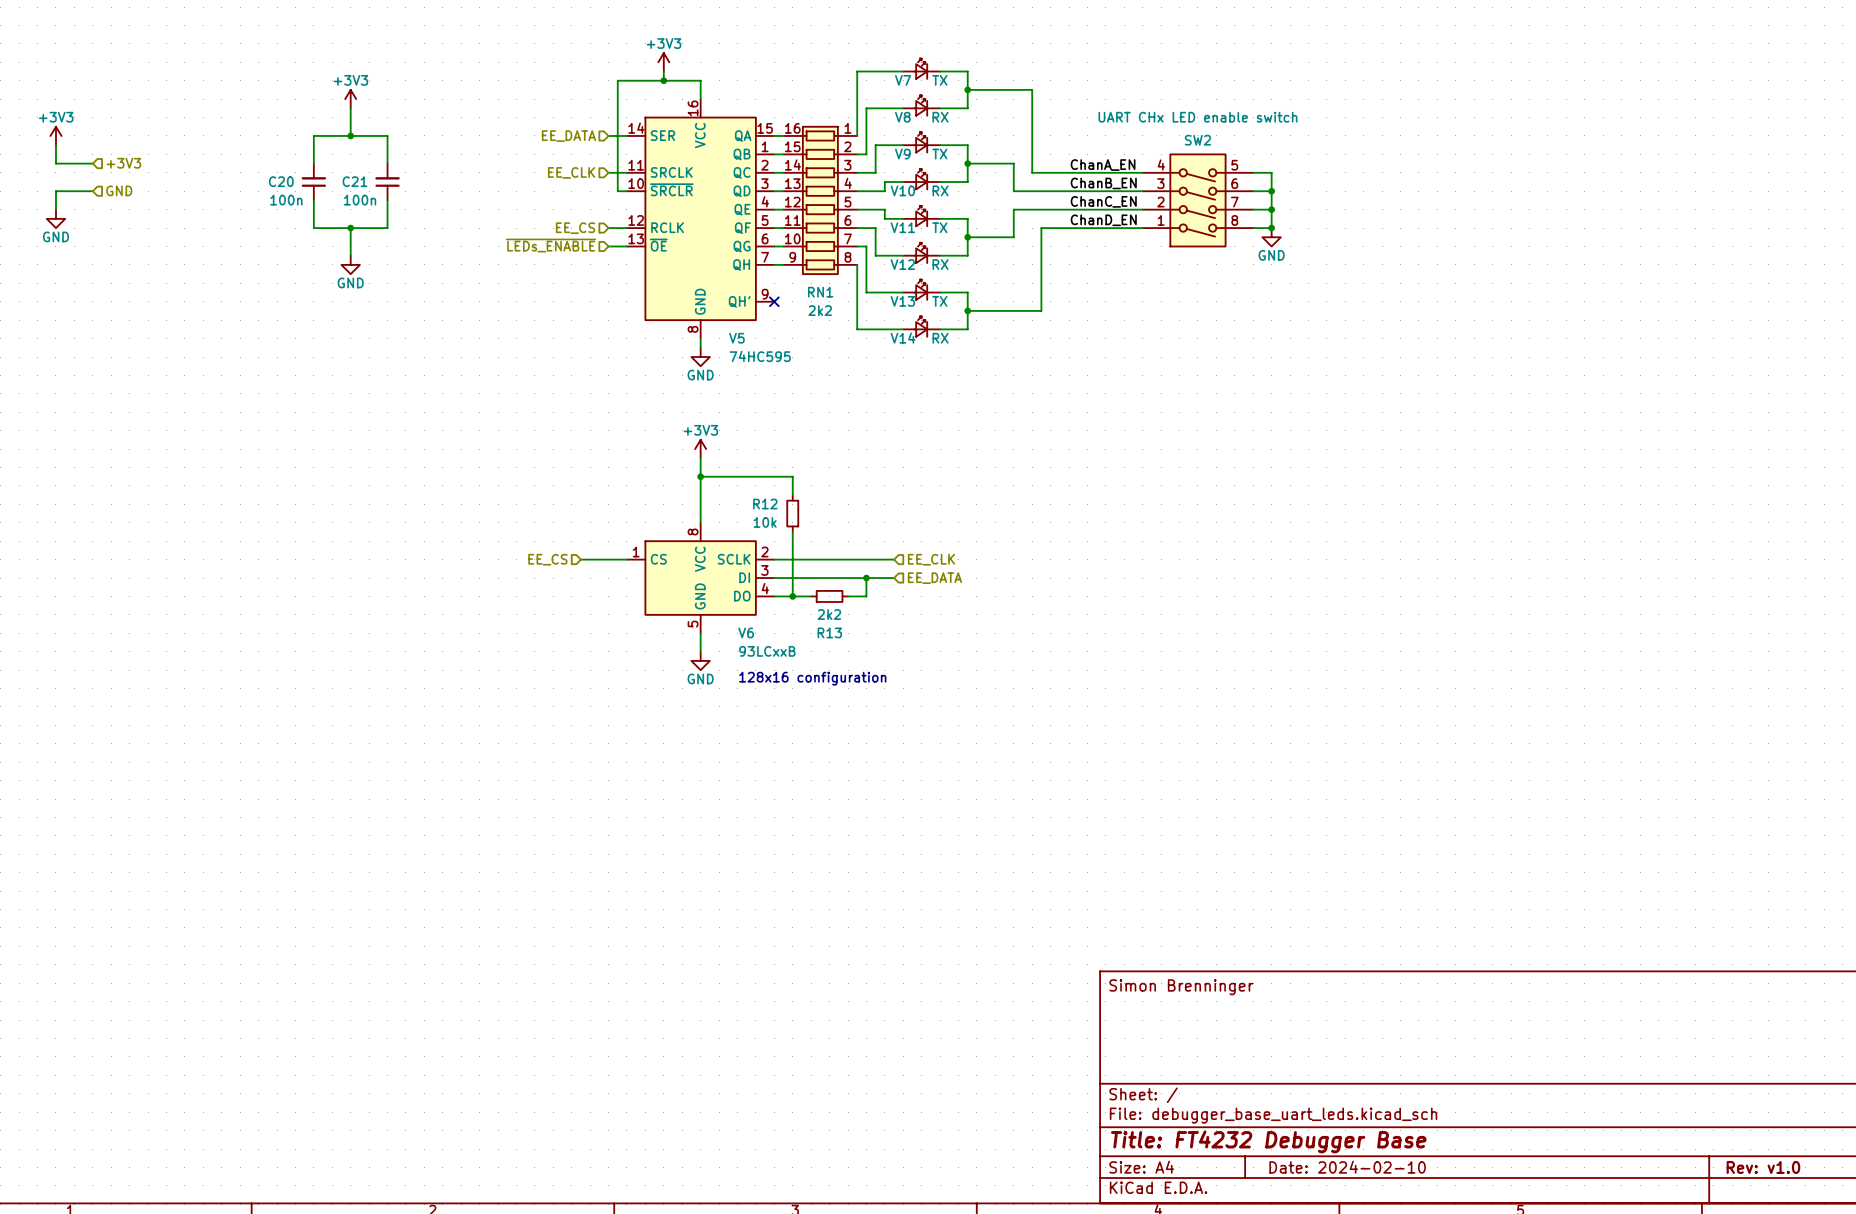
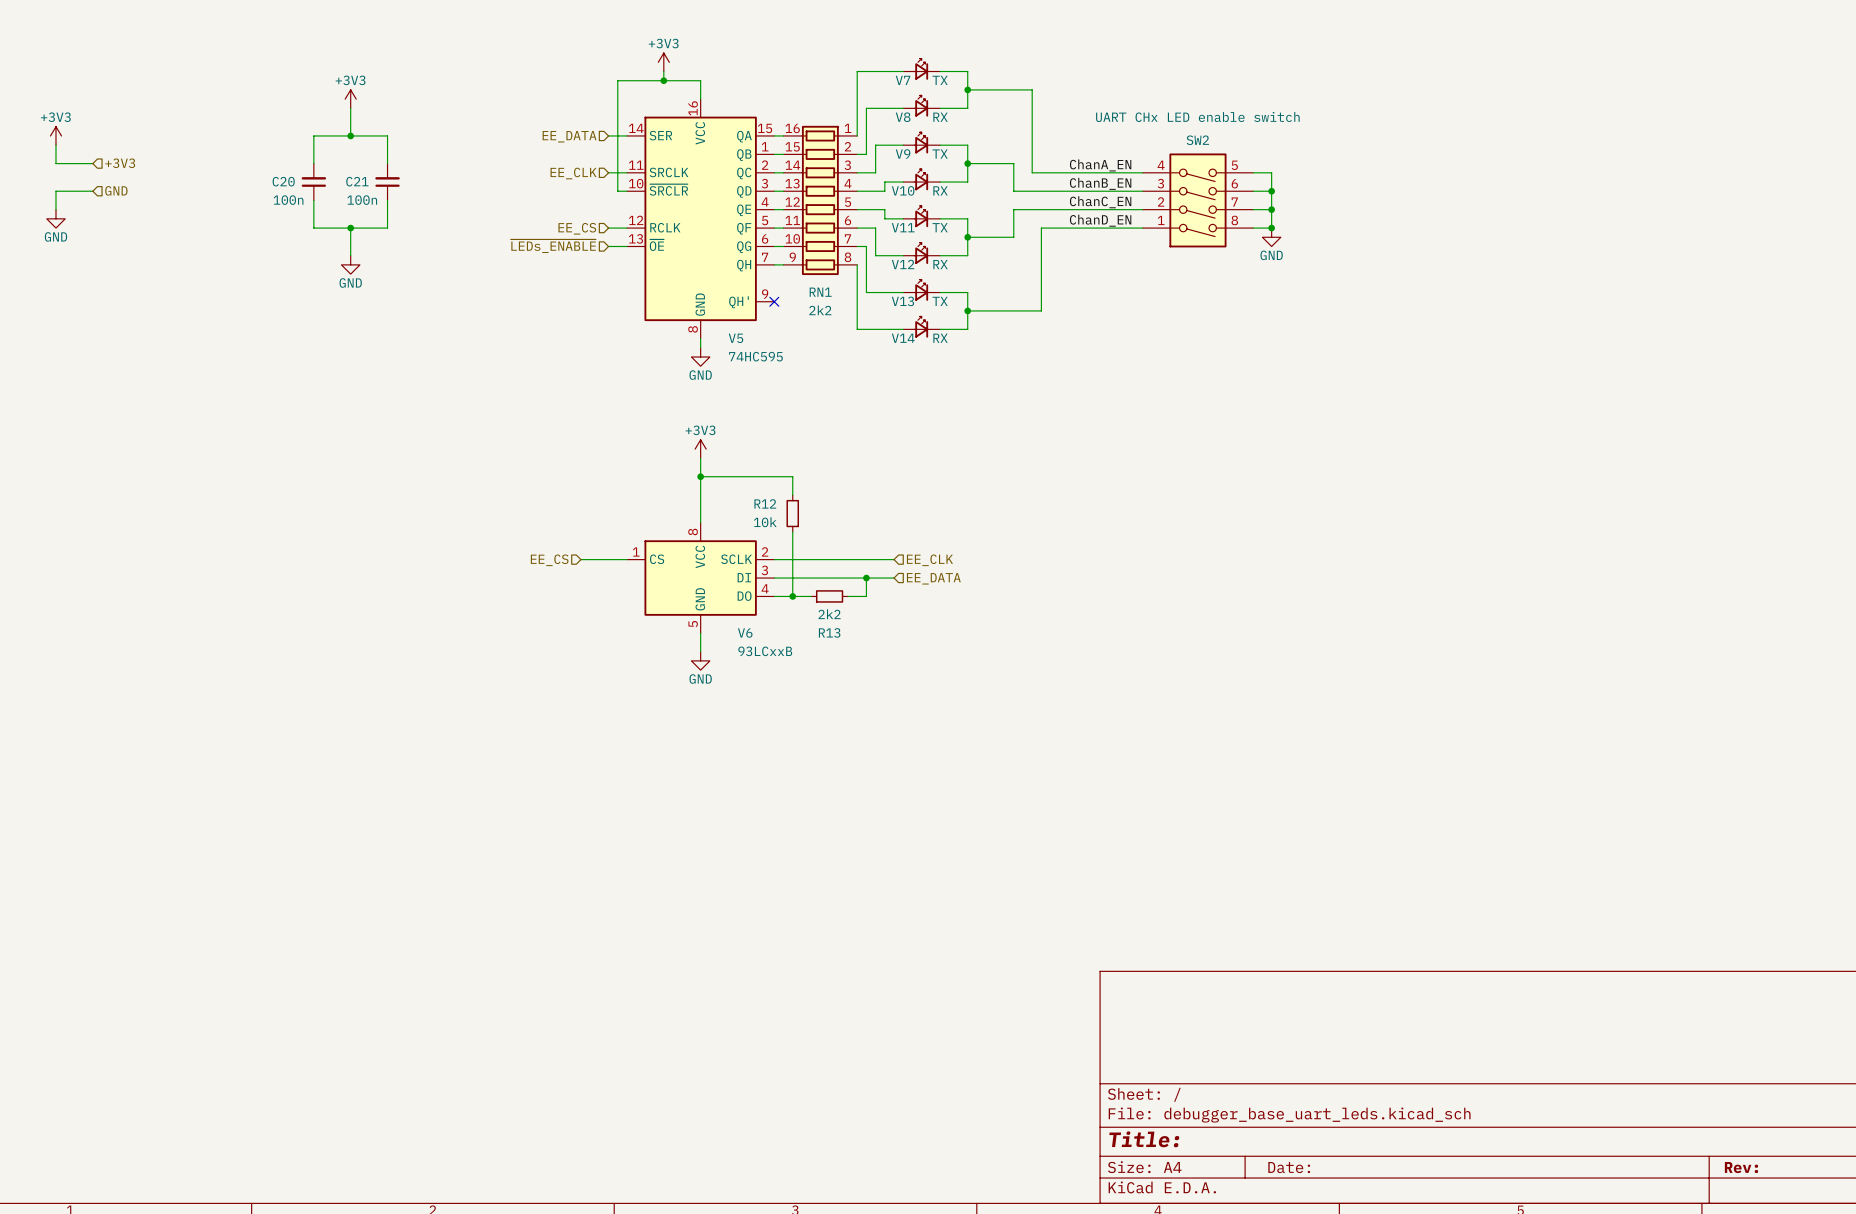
text: 128x16 configuration (812, 678) -> none
title block: Simon Brenninger (1181, 987) -> none
title block: Title: FT4232 Debugger Base (1268, 1141) -> Title: (1144, 1139)
title block: Date: 2024-02-10 (1347, 1167) -> Date: (1289, 1167)
title block: Rev: v1.0 (1763, 1167) -> Rev: (1741, 1167)

